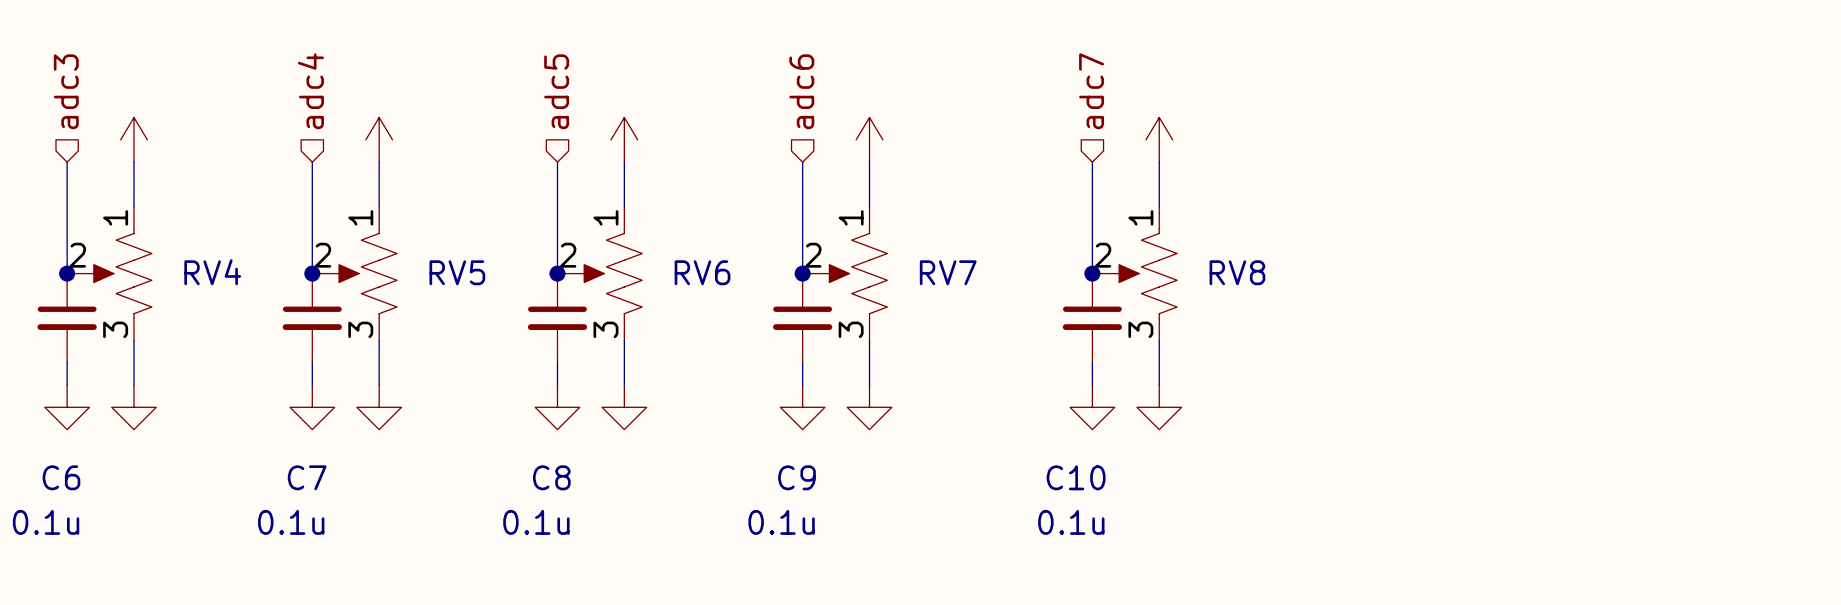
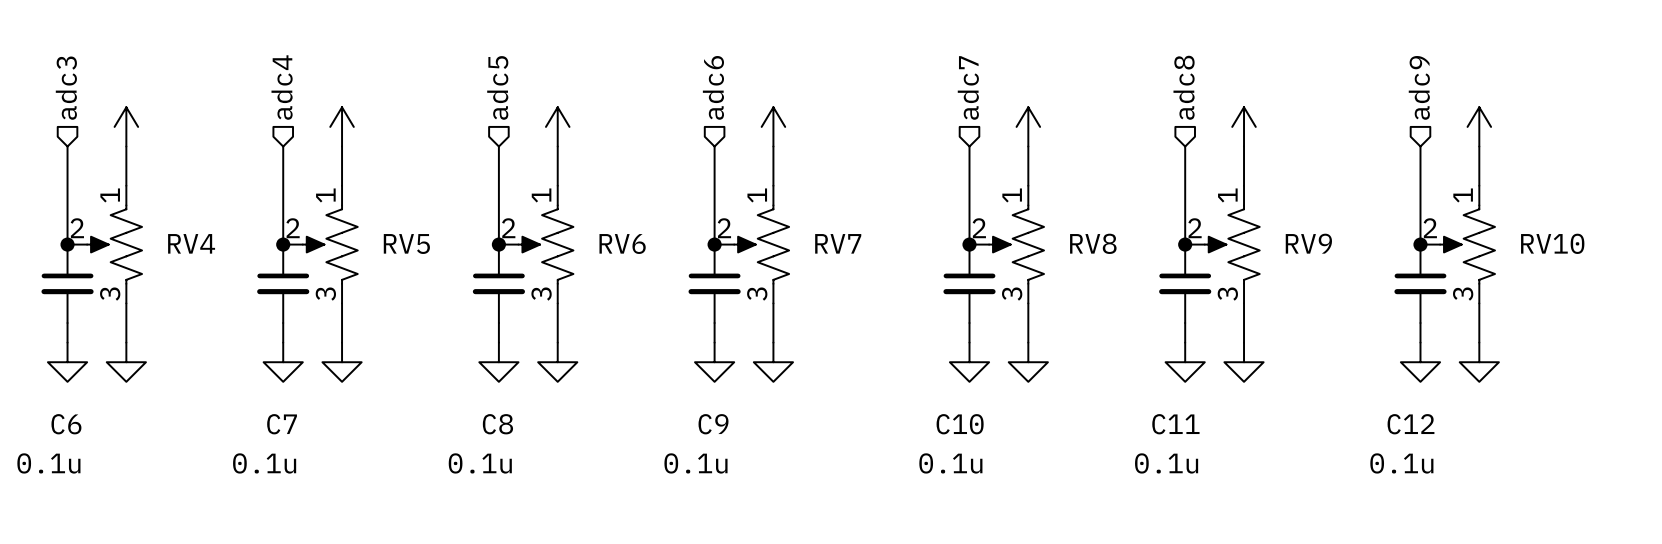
hierarchical label: none -> adc8 (1184, 87)
hierarchical label: none -> adc9 (1419, 87)
power symbol: none -> (1244, 126)
power symbol: none -> (1479, 126)
wire: none -> (1185, 146) (1185, 244)
wire: none -> (1244, 146) (1244, 185)
wire: none -> (1420, 146) (1420, 244)
wire: none -> (1479, 146) (1479, 185)
junction: none -> (1185, 244)
RV9: none -> (1222, 244)
junction: none -> (1420, 244)
RV10: none -> (1457, 244)
C11: none -> 0.1u (1185, 283)
C12: none -> 0.1u (1420, 283)
wire: none -> (1244, 303) (1244, 342)
wire: none -> (1479, 303) (1479, 342)
wire: none -> (1185, 323) (1185, 342)
wire: none -> (1420, 323) (1420, 342)
power symbol: none -> (1185, 362)
power symbol: none -> (1244, 362)
power symbol: none -> (1420, 362)
power symbol: none -> (1479, 362)

